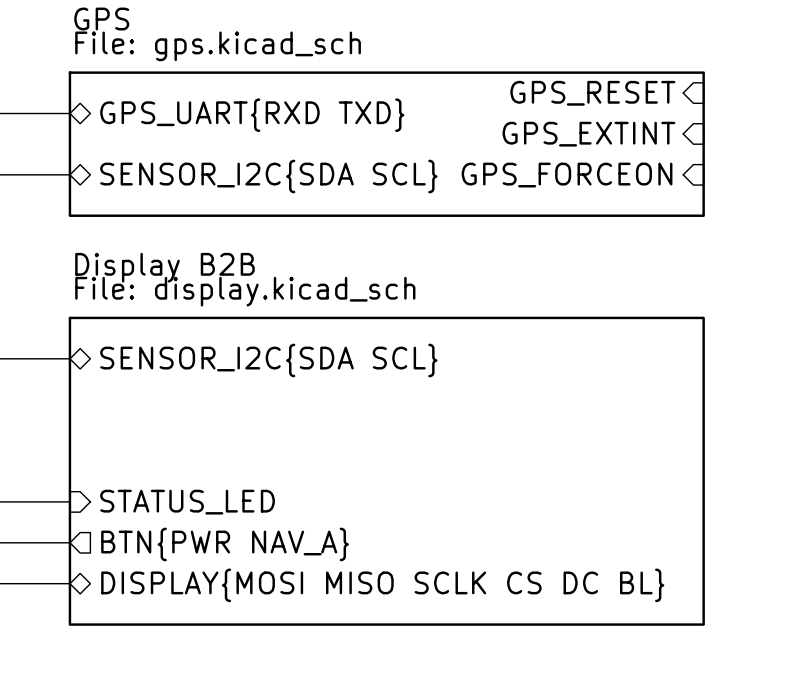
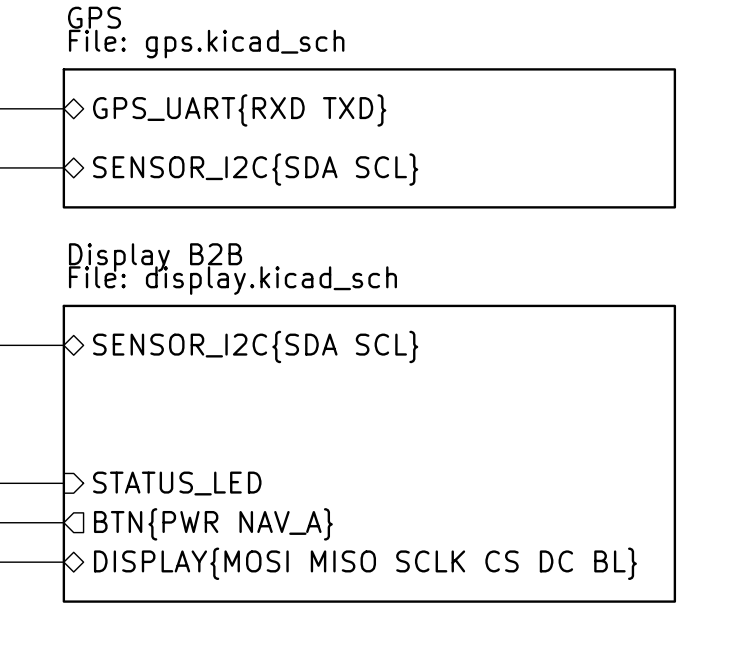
sheet pin: GPS_RESET (592, 93) -> none
sheet pin: GPS_EXTINT (588, 134) -> none
sheet pin: GPS_FORCEON (567, 175) -> none

